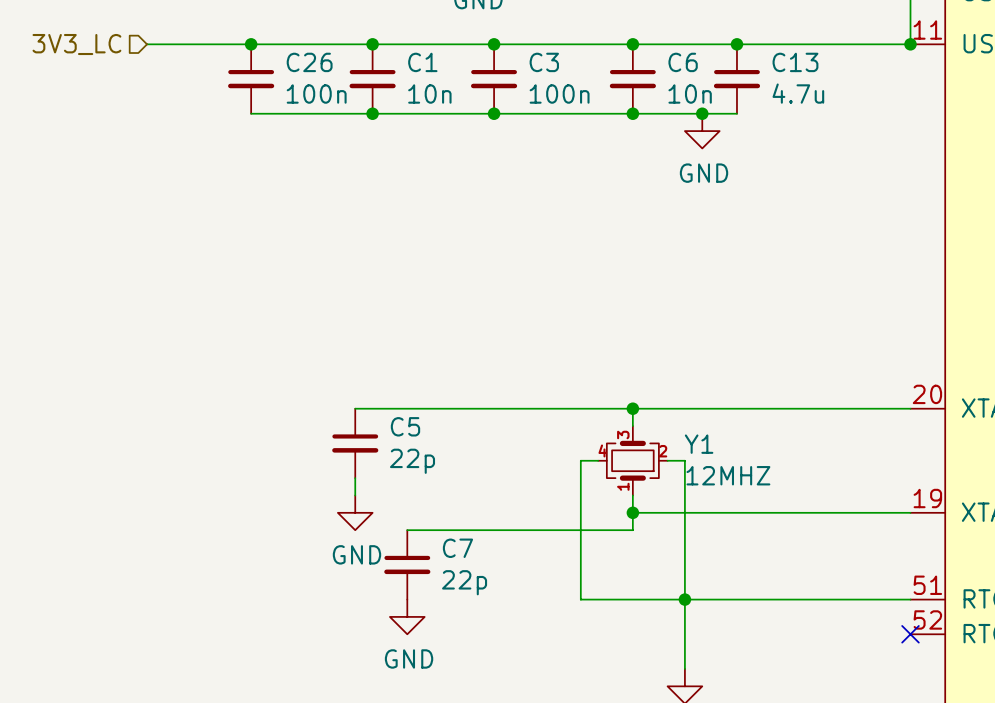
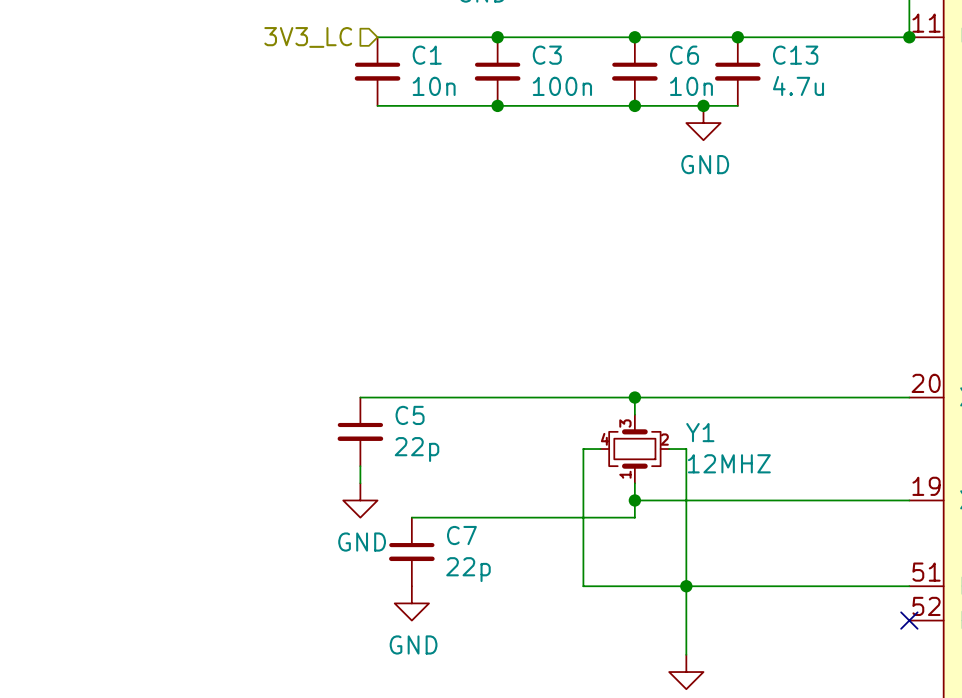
hierarchical label position: 3V3_LC (76, 44) -> 3V3_LC (308, 37)
wire: (147, 44) (372, 44) -> none
junction: (251, 44) -> none
junction: (372, 44) -> none
C26: 100n (251, 79) -> none
wire: (251, 113) (372, 113) -> none
junction: (372, 113) -> none

